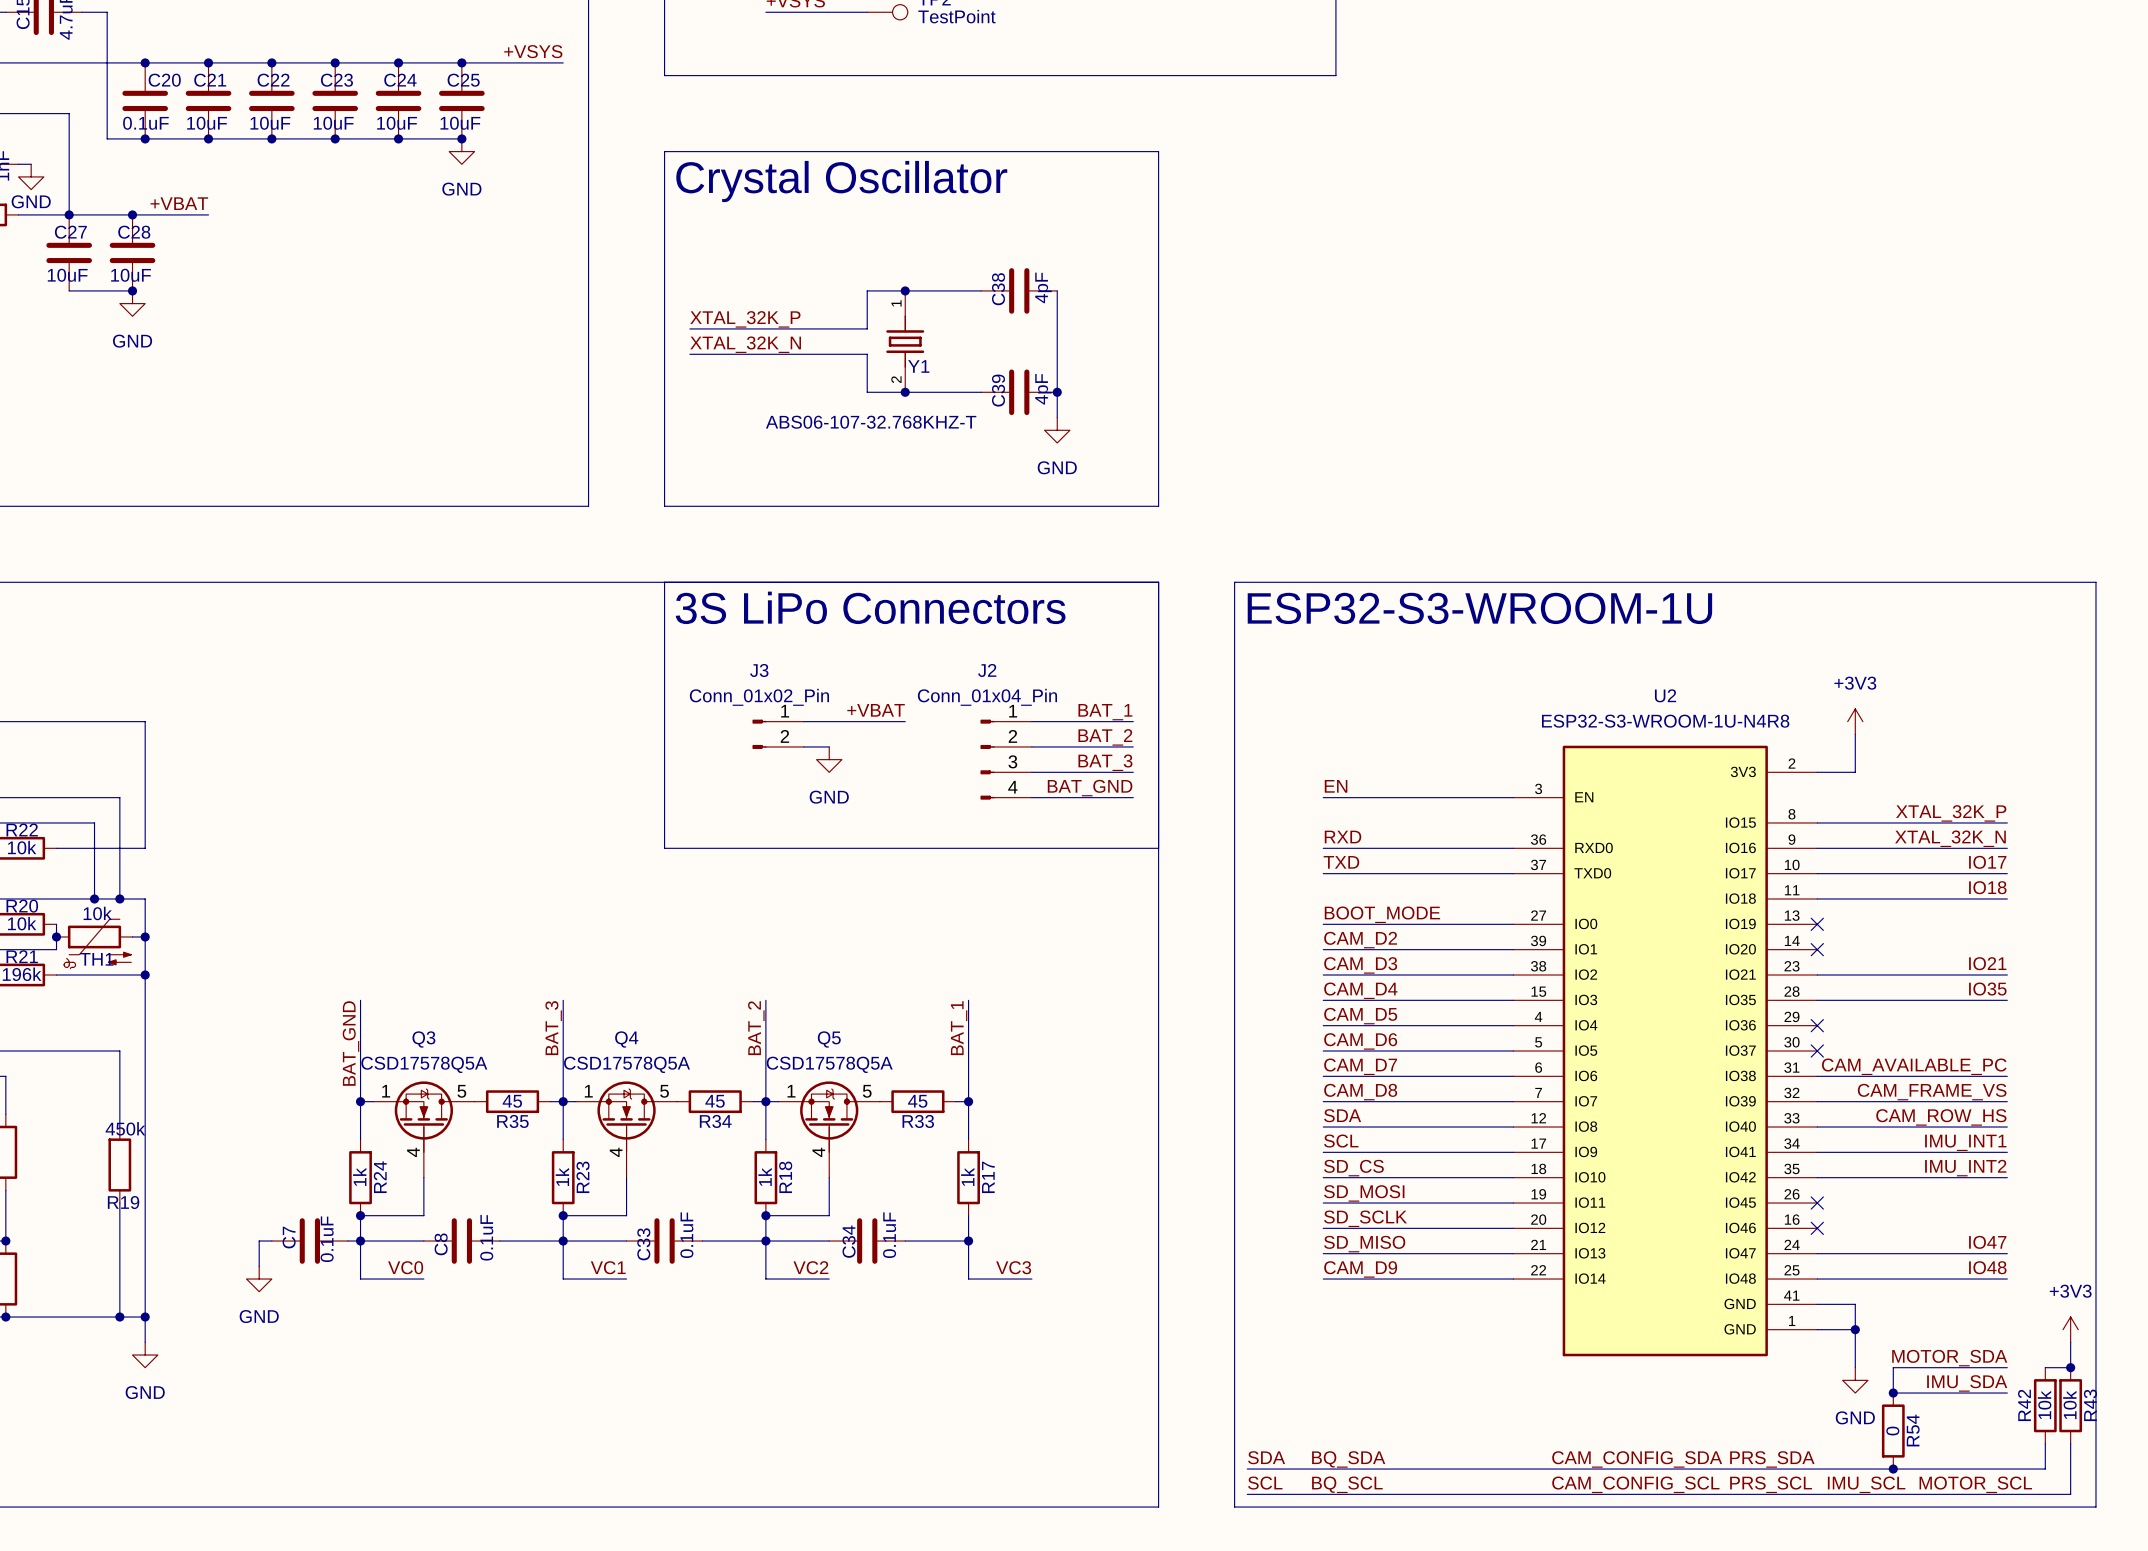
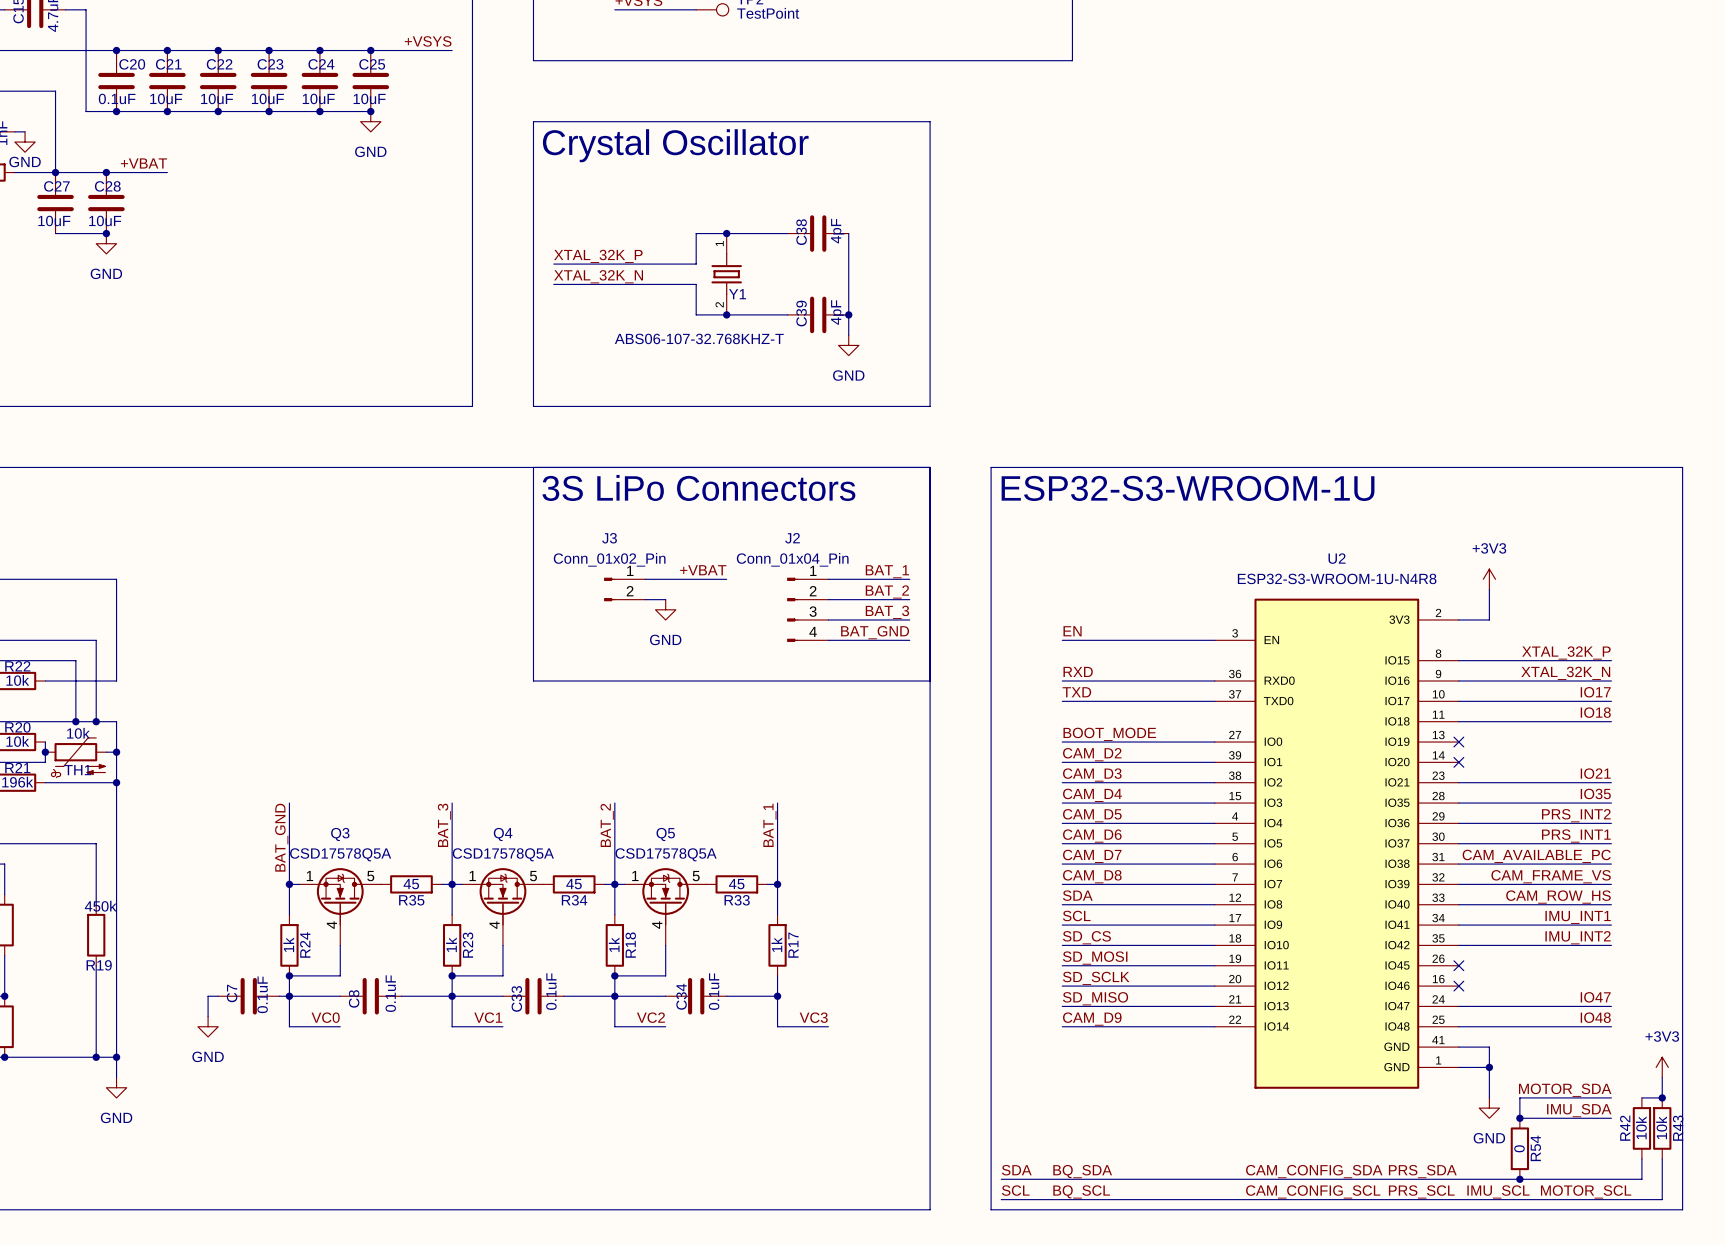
label: none -> PRS_INT2 (1576, 815)
wire: none -> (1458, 823) (1611, 823)
no-connect mark: (1817, 1025) -> none
label: none -> PRS_INT1 (1576, 836)
wire: none -> (1458, 843) (1611, 843)
no-connect mark: (1817, 1051) -> none

